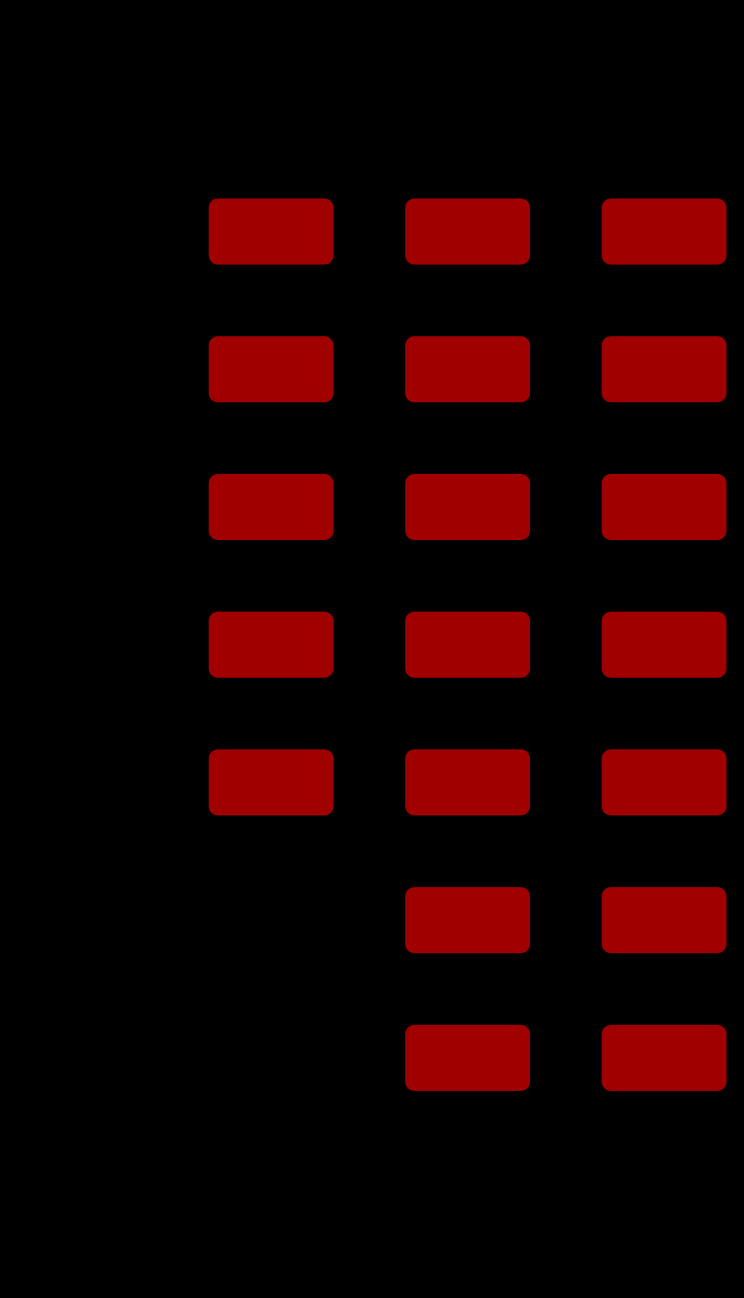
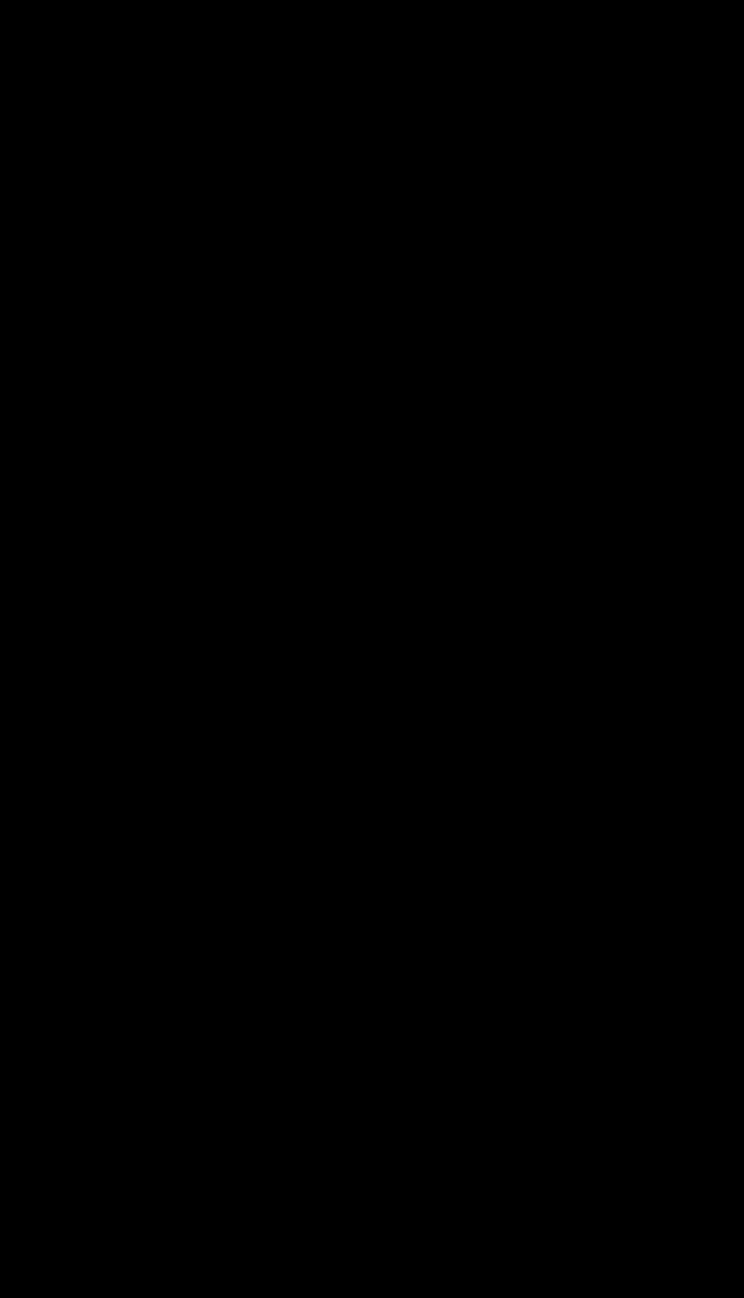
part: (271, 231) -> none
part: (467, 231) -> none
part: (664, 231) -> none
part: (271, 369) -> none
part: (467, 369) -> none
part: (664, 369) -> none
part: (271, 506) -> none
part: (467, 506) -> none
part: (664, 506) -> none
part: (271, 644) -> none
part: (467, 644) -> none
part: (664, 644) -> none
part: (271, 782) -> none
part: (467, 782) -> none
part: (664, 782) -> none
part: (467, 920) -> none
part: (664, 920) -> none
part: (467, 1057) -> none
part: (664, 1057) -> none

